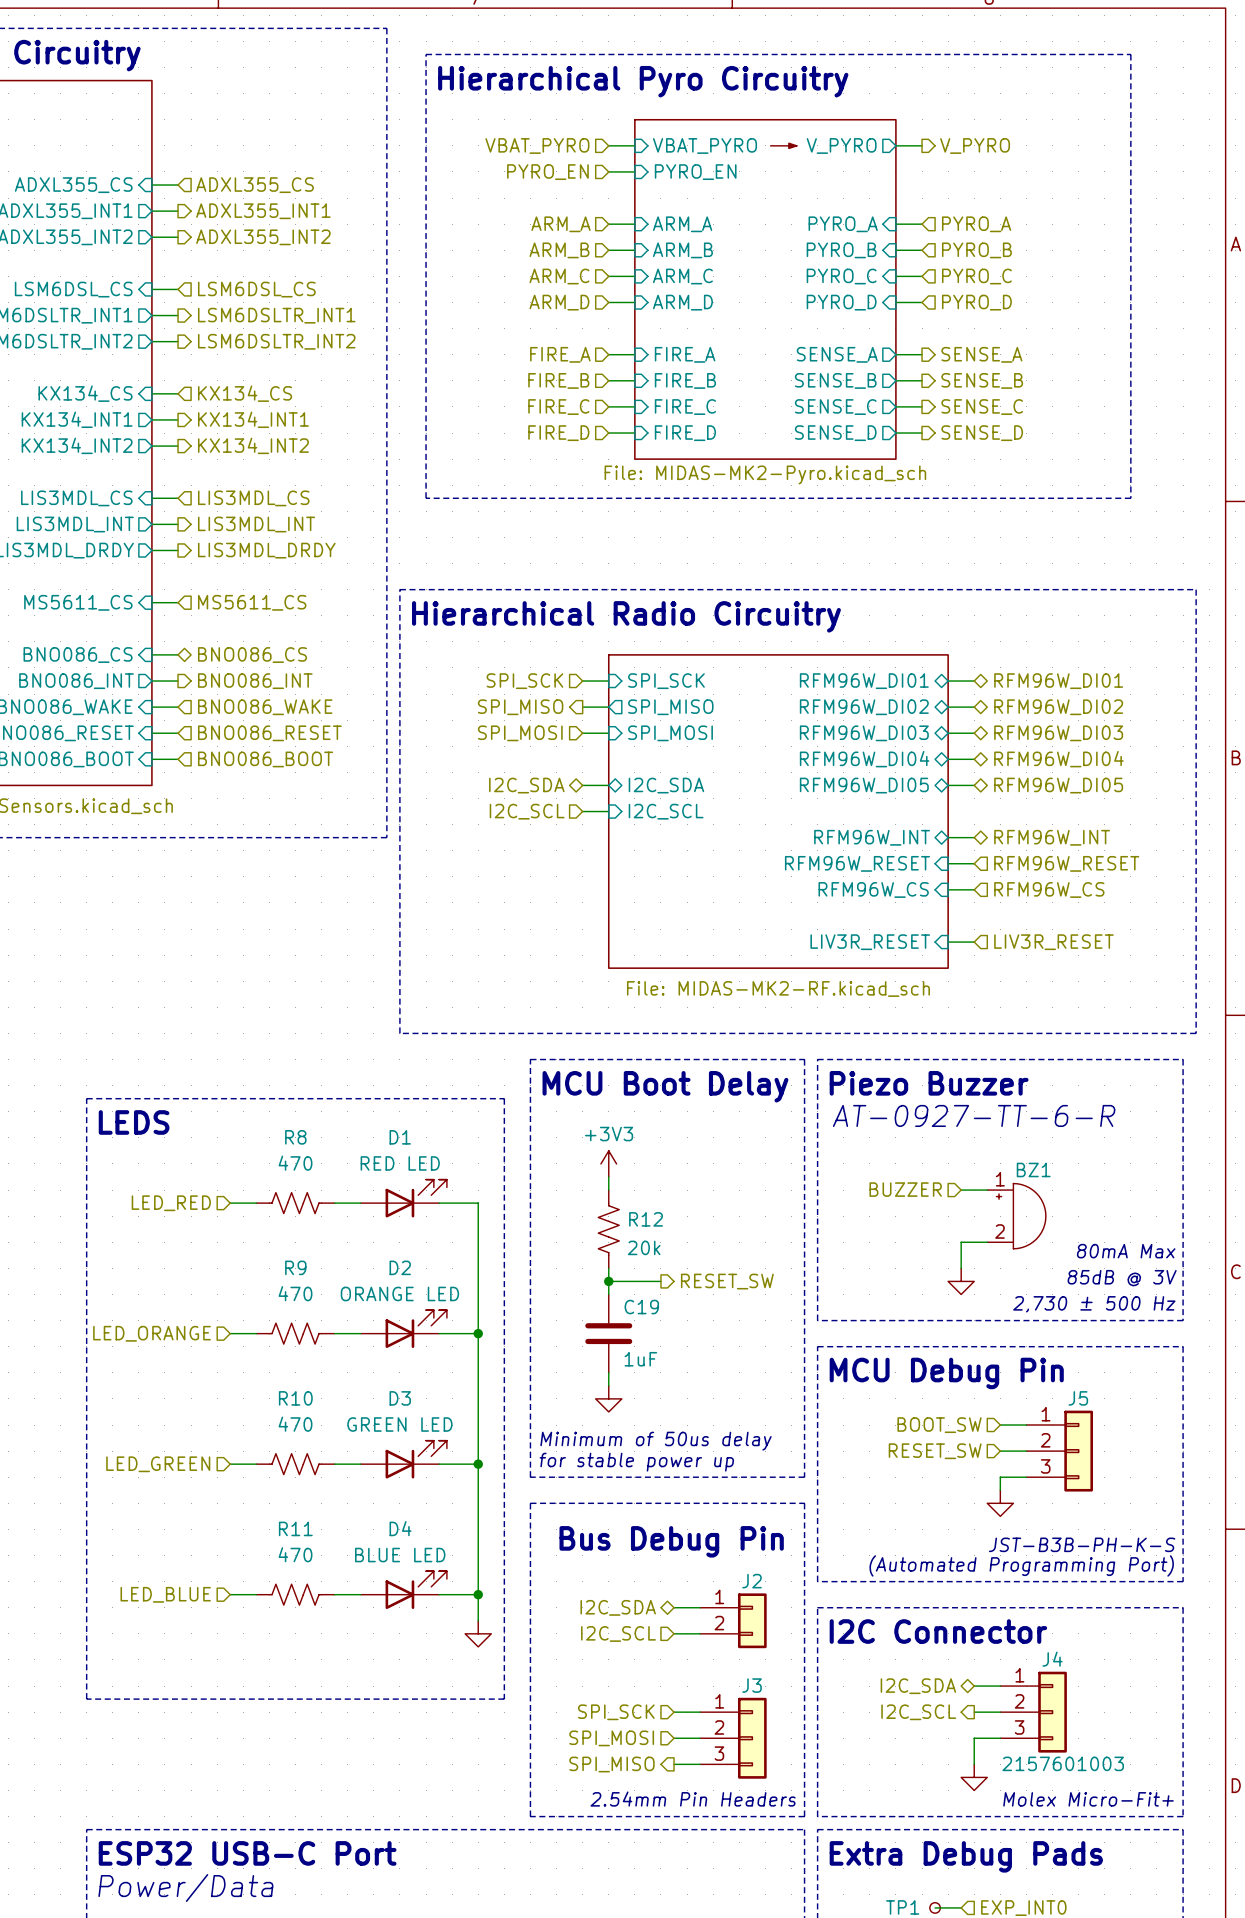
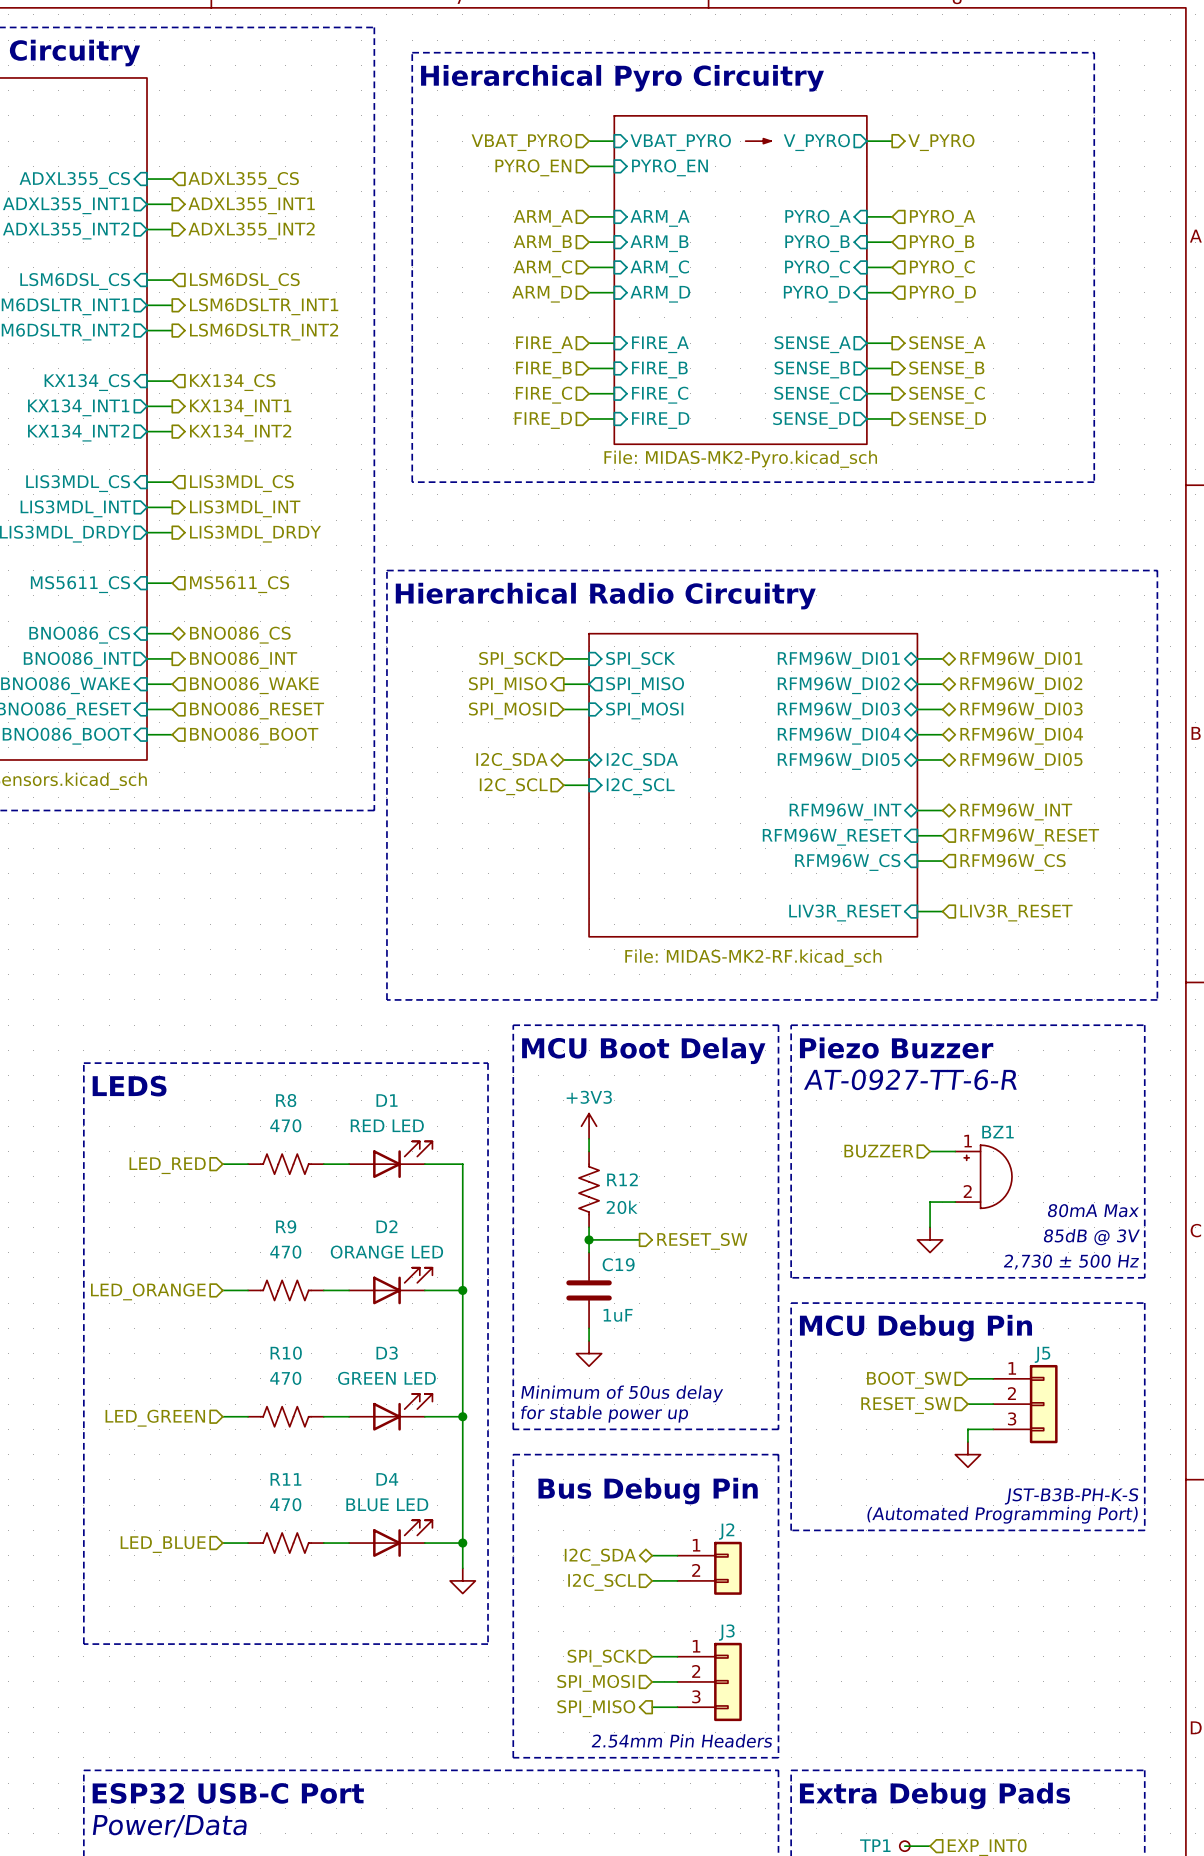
line: (817, 1607) (1183, 1607) (1183, 1816) (817, 1816) (817, 1607) -> none
text: I2C Connector (938, 1631) -> none
hierarchical label: I2C_SDA (918, 1686) -> none
wire: (974, 1686) (1000, 1686) -> none
hierarchical label: I2C_SCL (918, 1712) -> none
wire: (974, 1712) (1000, 1712) -> none
J4: 2157601003 (1033, 1712) -> none
wire: (1000, 1738) (974, 1738) (974, 1764) -> none
power symbol: (974, 1777) -> none
text: Molex Micro-Fit+ (1088, 1799) -> none

